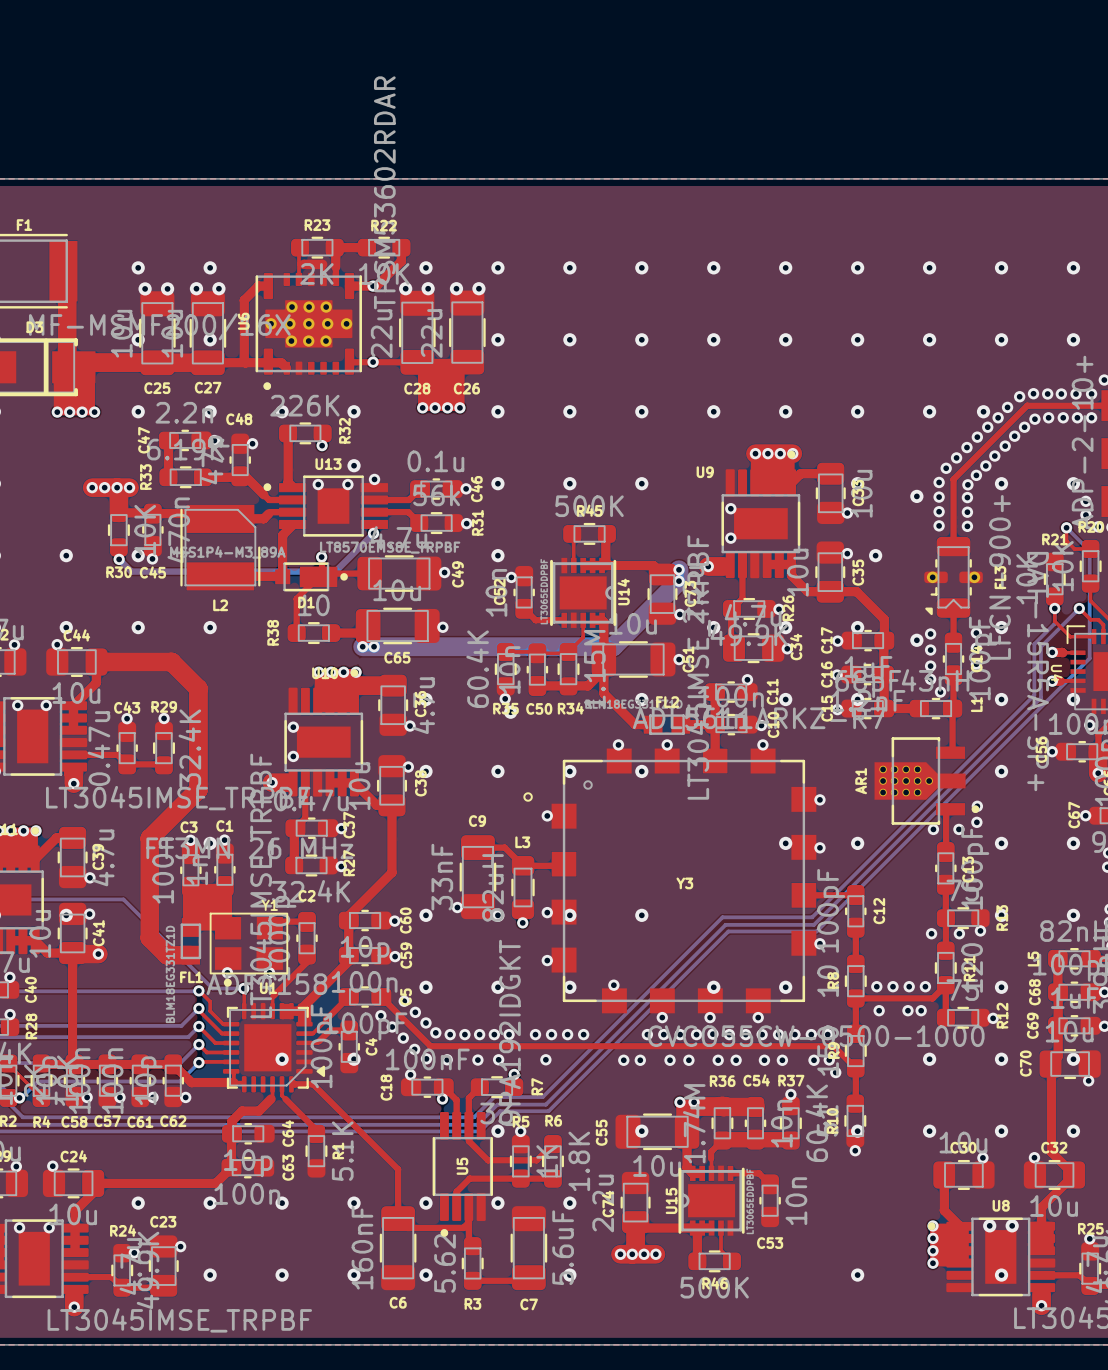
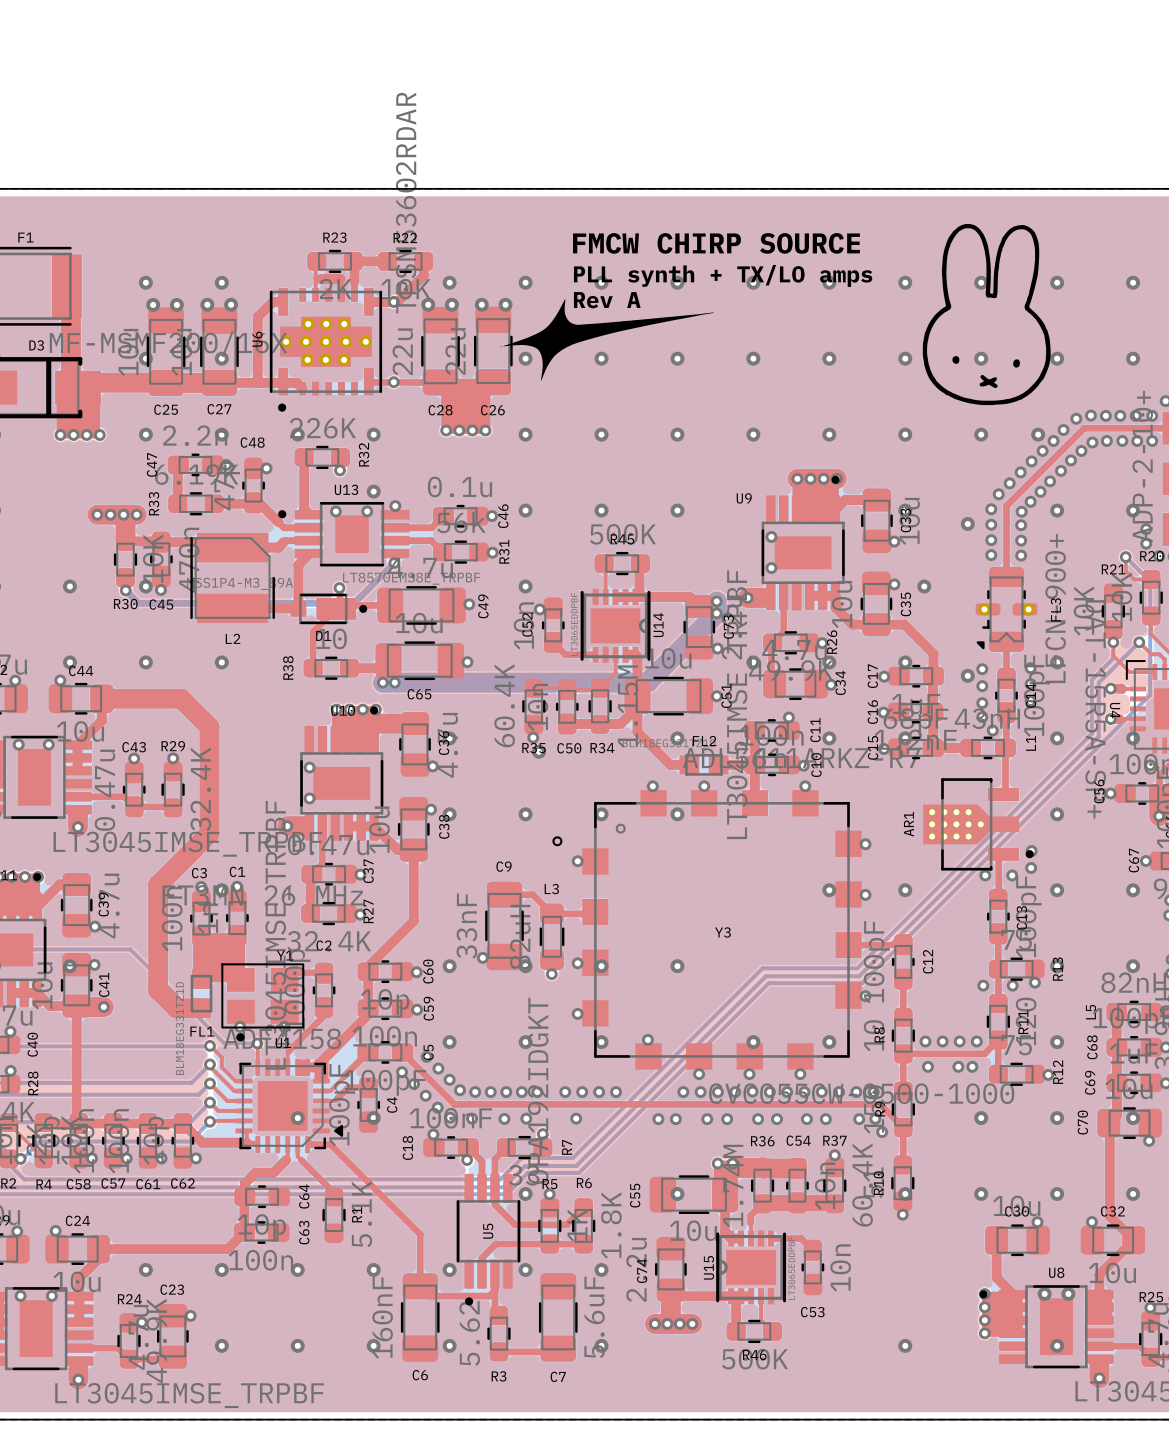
drawing: none -> [922, 223, 1051, 406]
text: none -> FMCW CHIRP SOURCE (716, 243)
text: none -> PLL synth + TX/LO amps (723, 275)
drawing: none -> [500, 299, 714, 381]
text: none -> Rev A (607, 300)

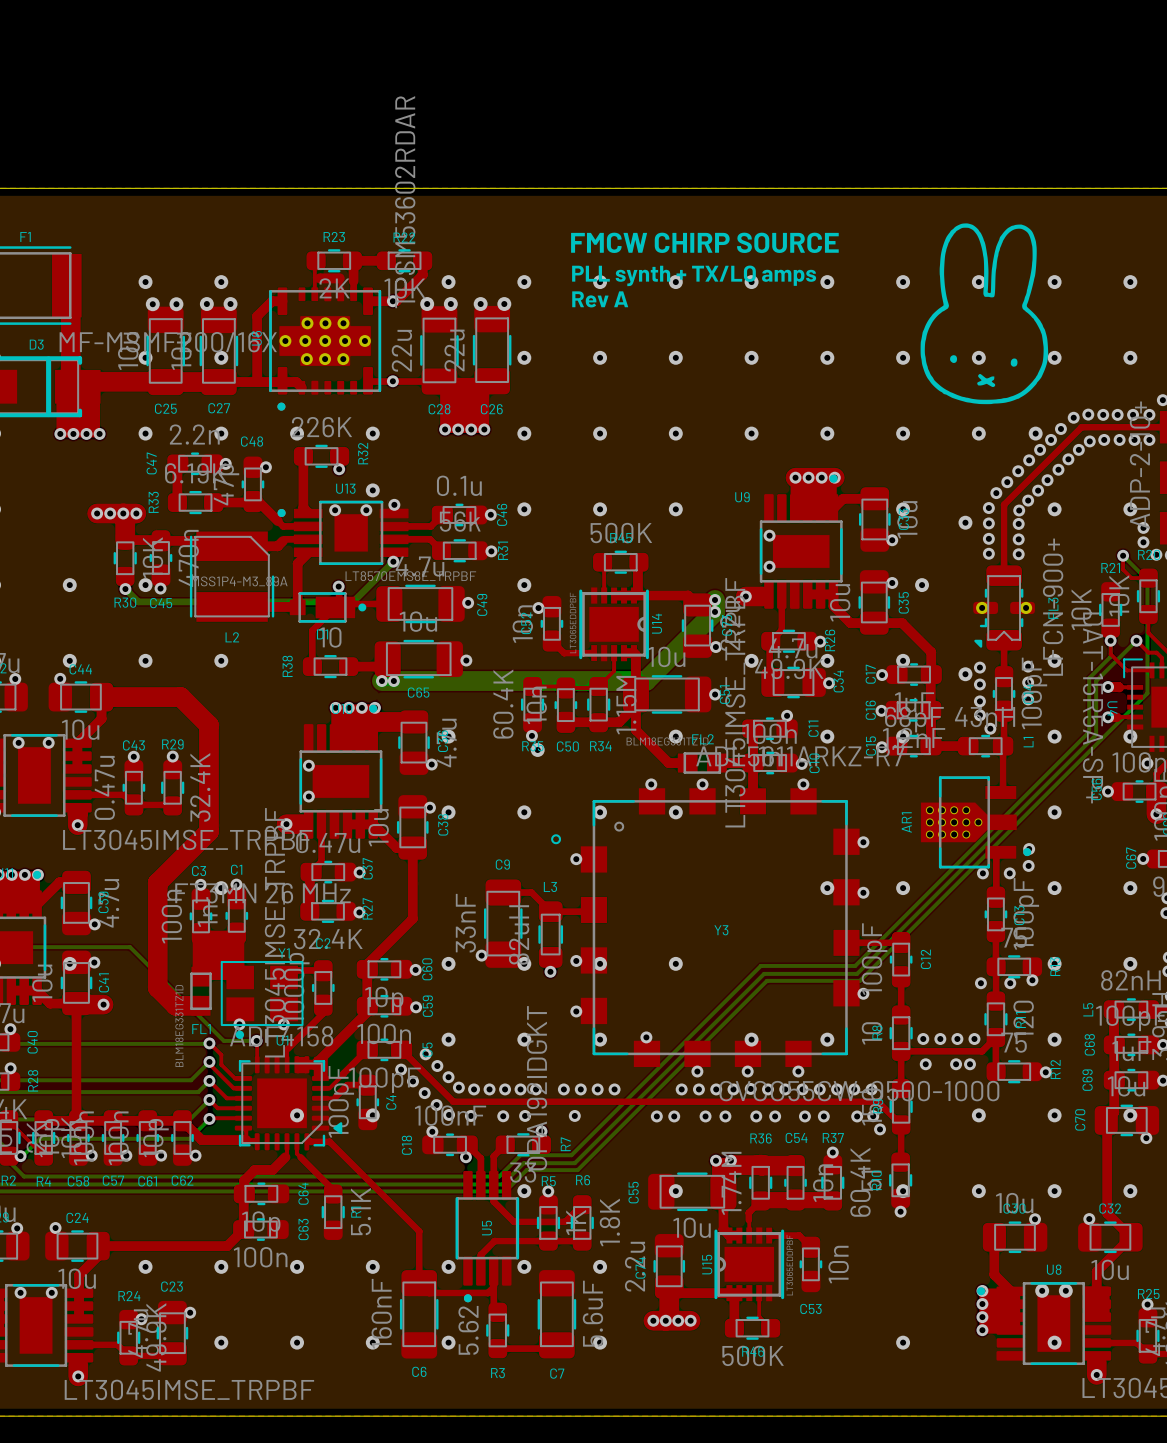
drawing: [500, 299, 714, 381] -> none

